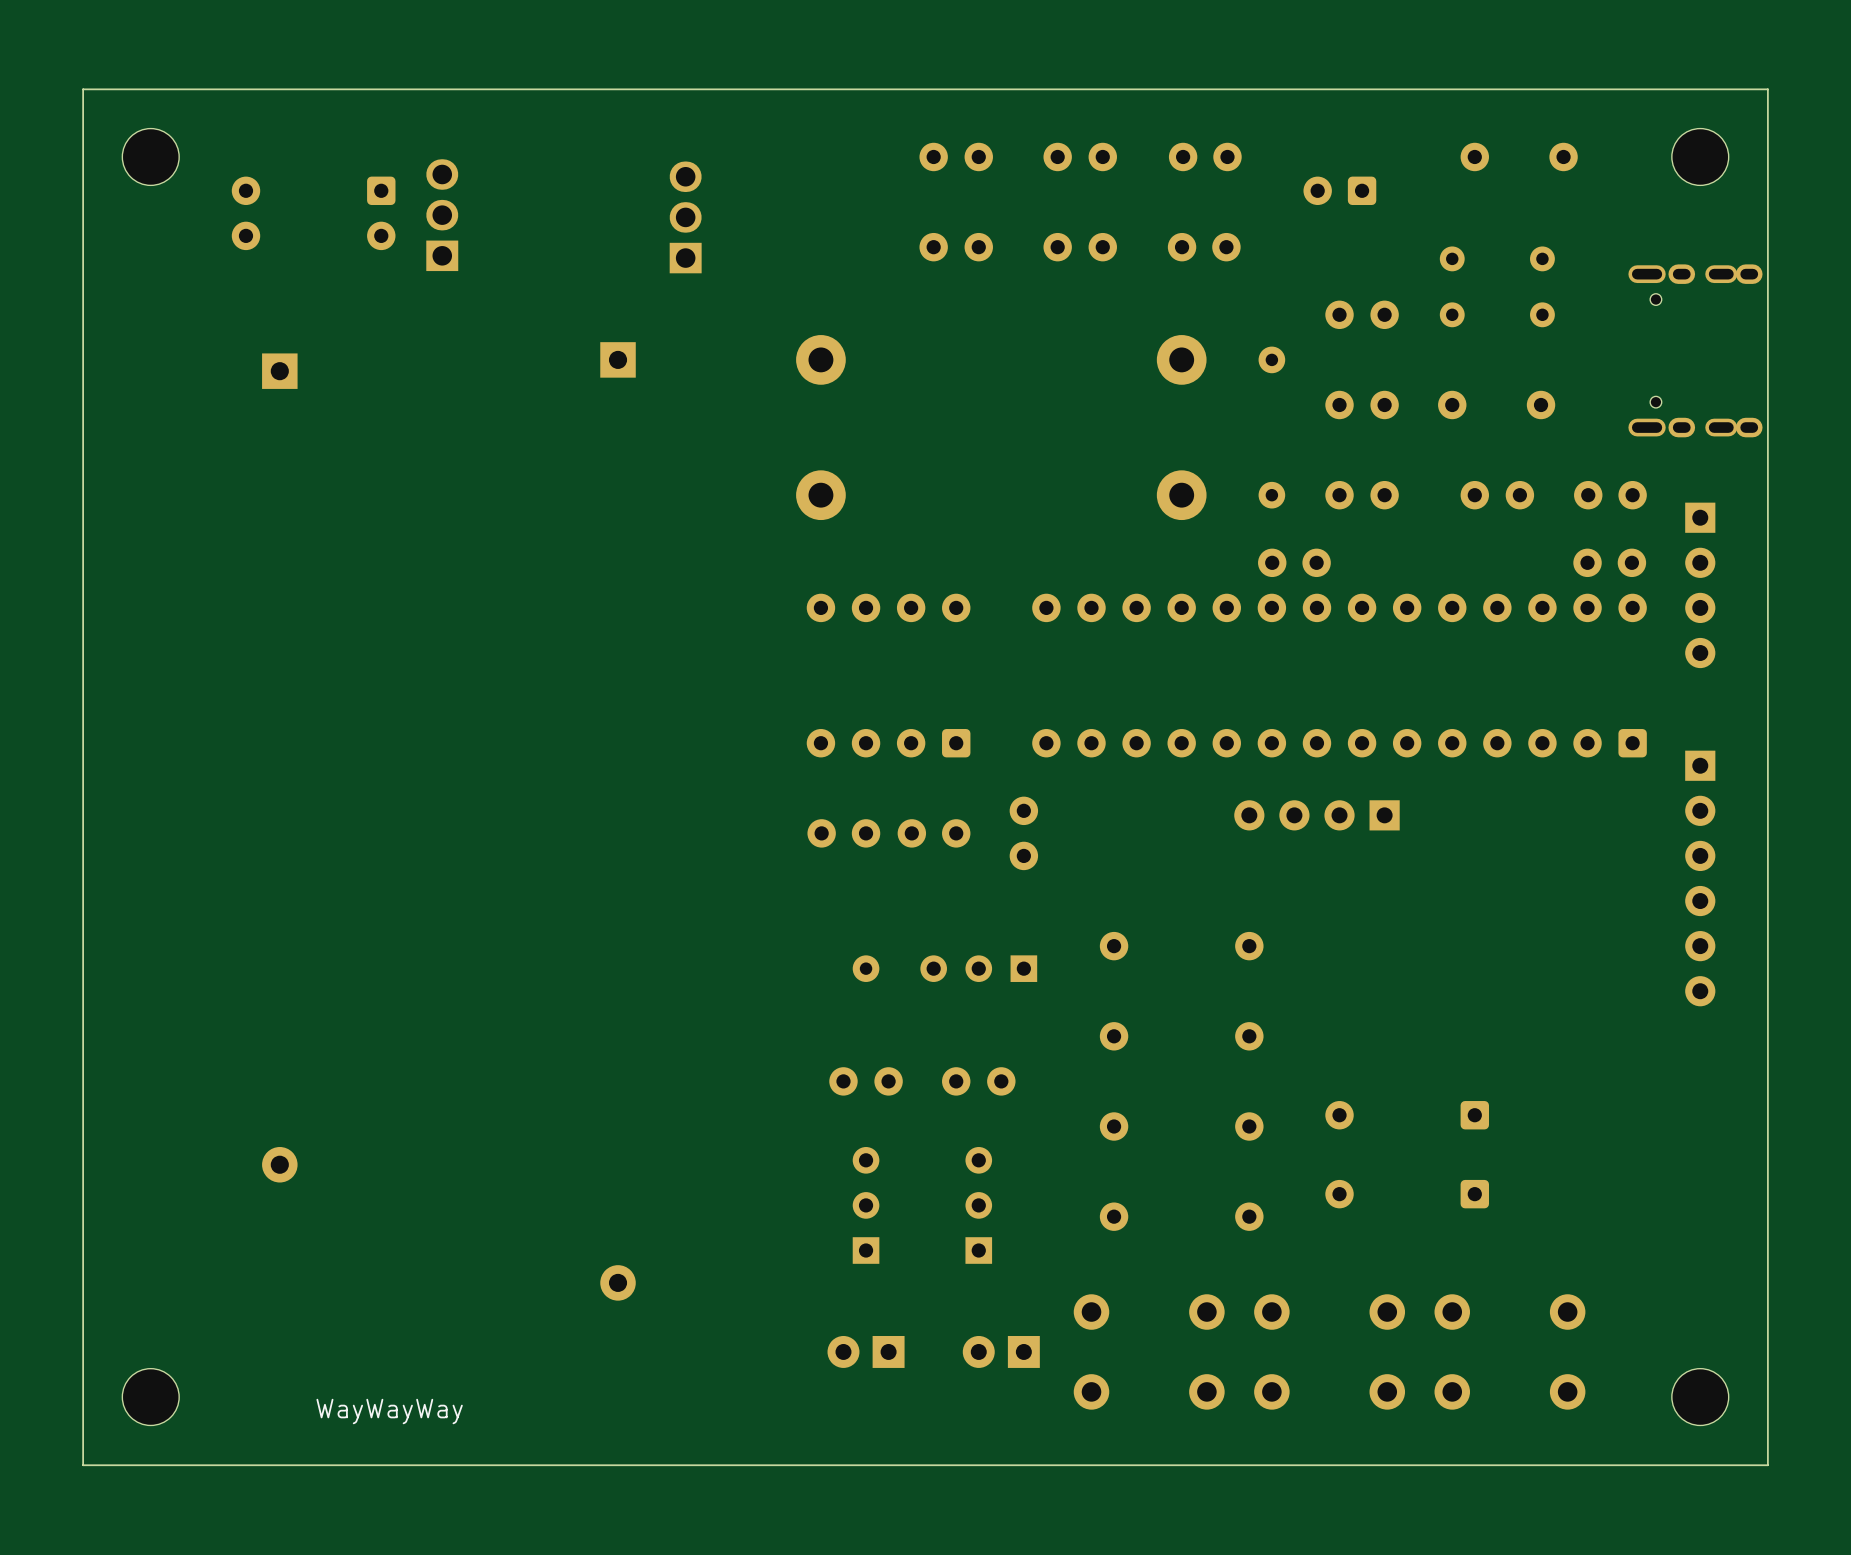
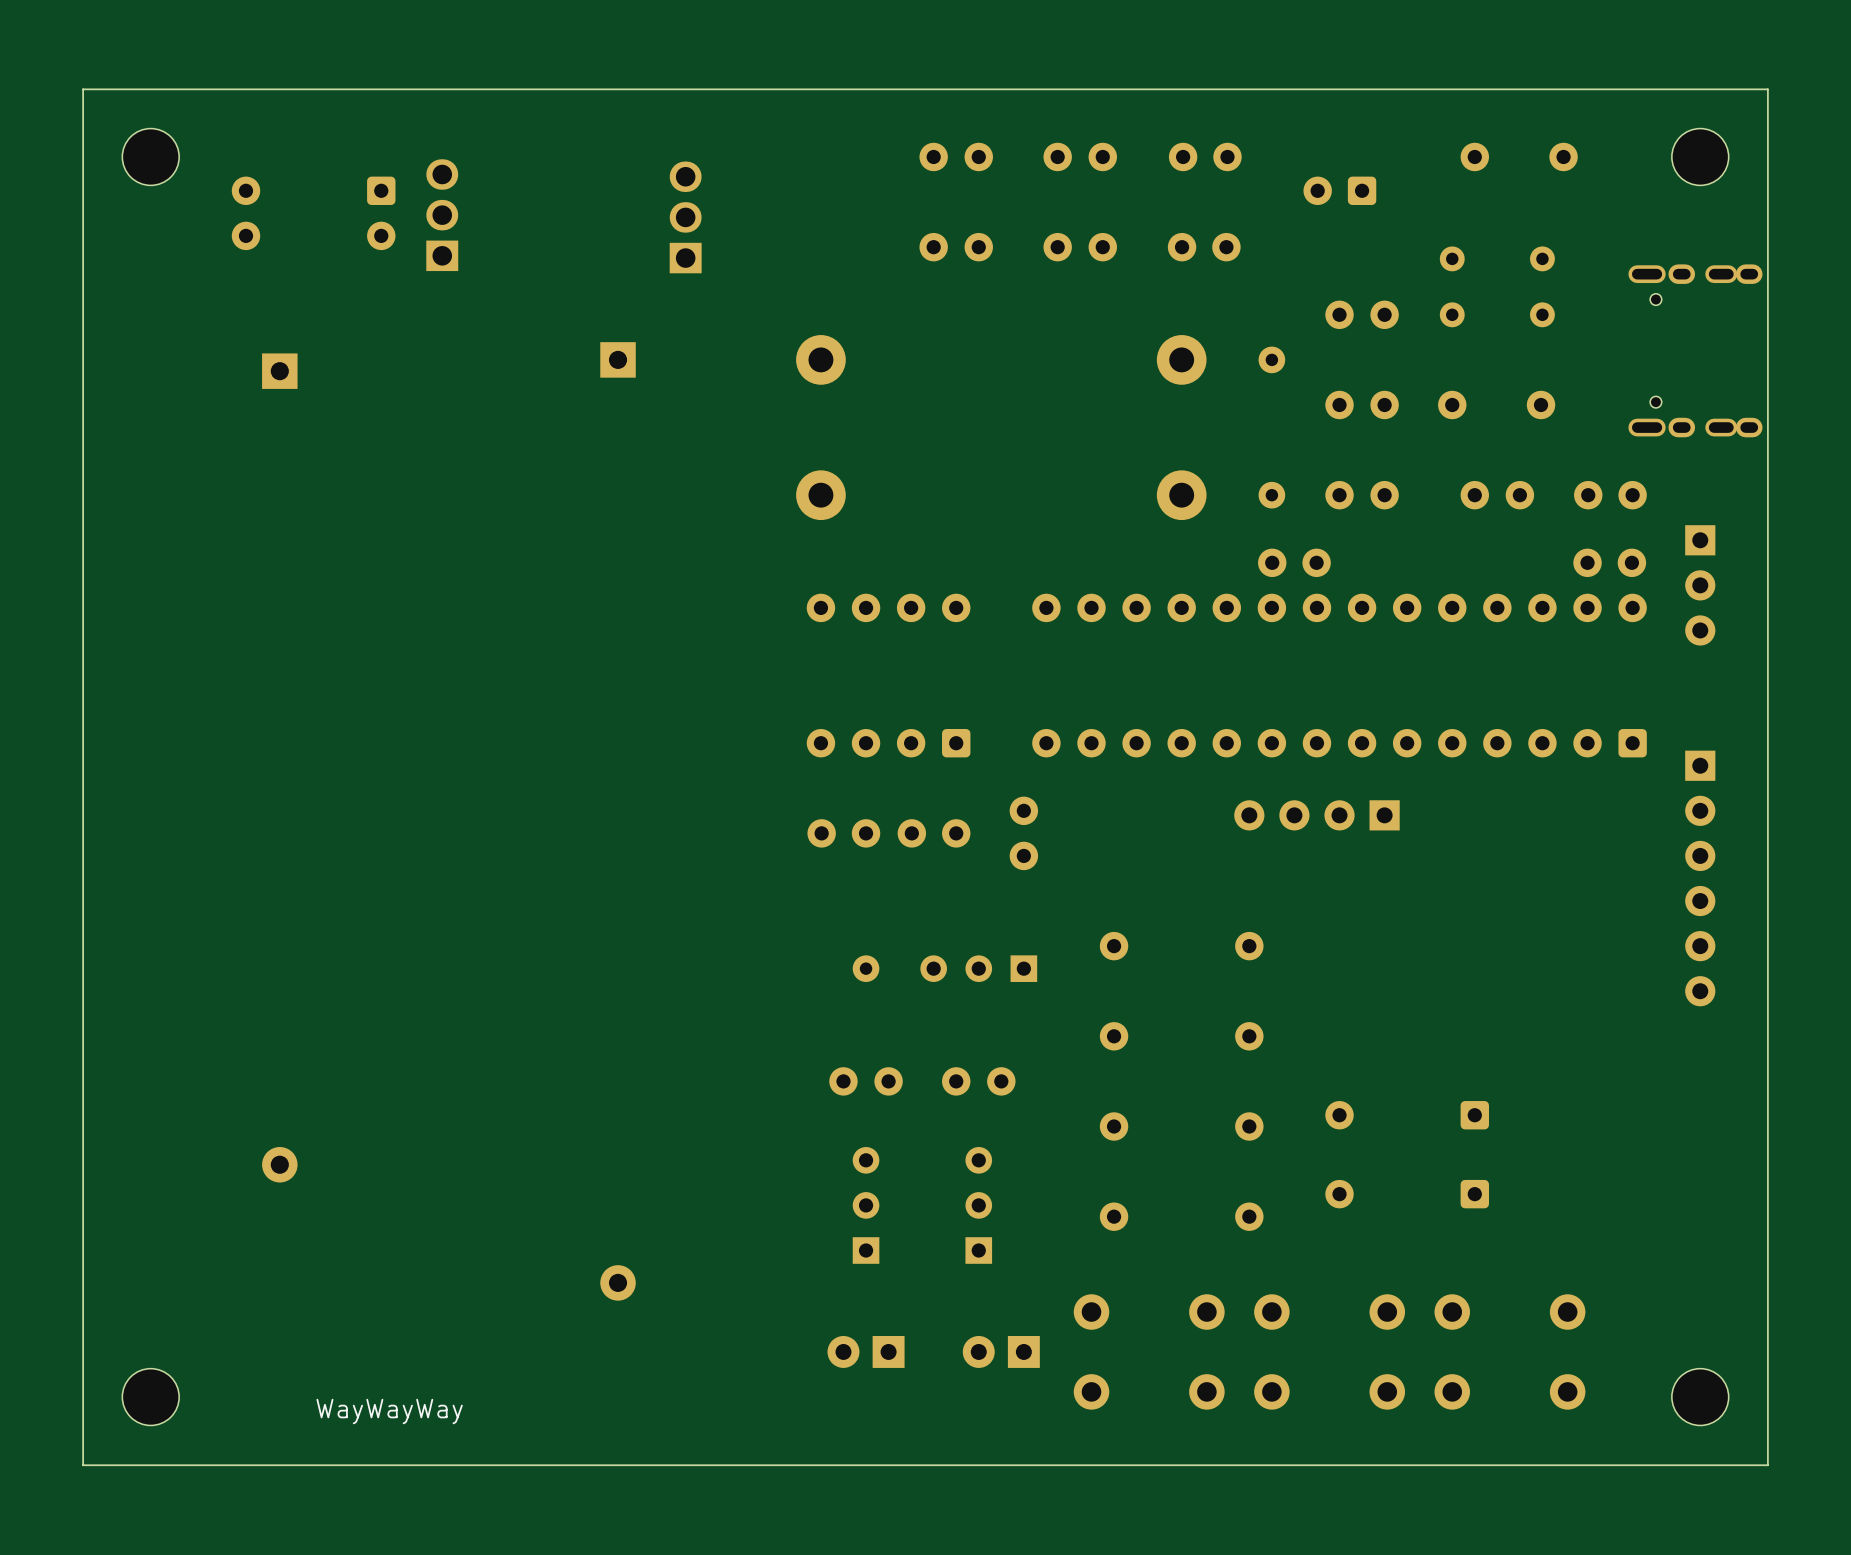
part footprint: [1685, 502, 1716, 669] -> [1685, 525, 1716, 646]

